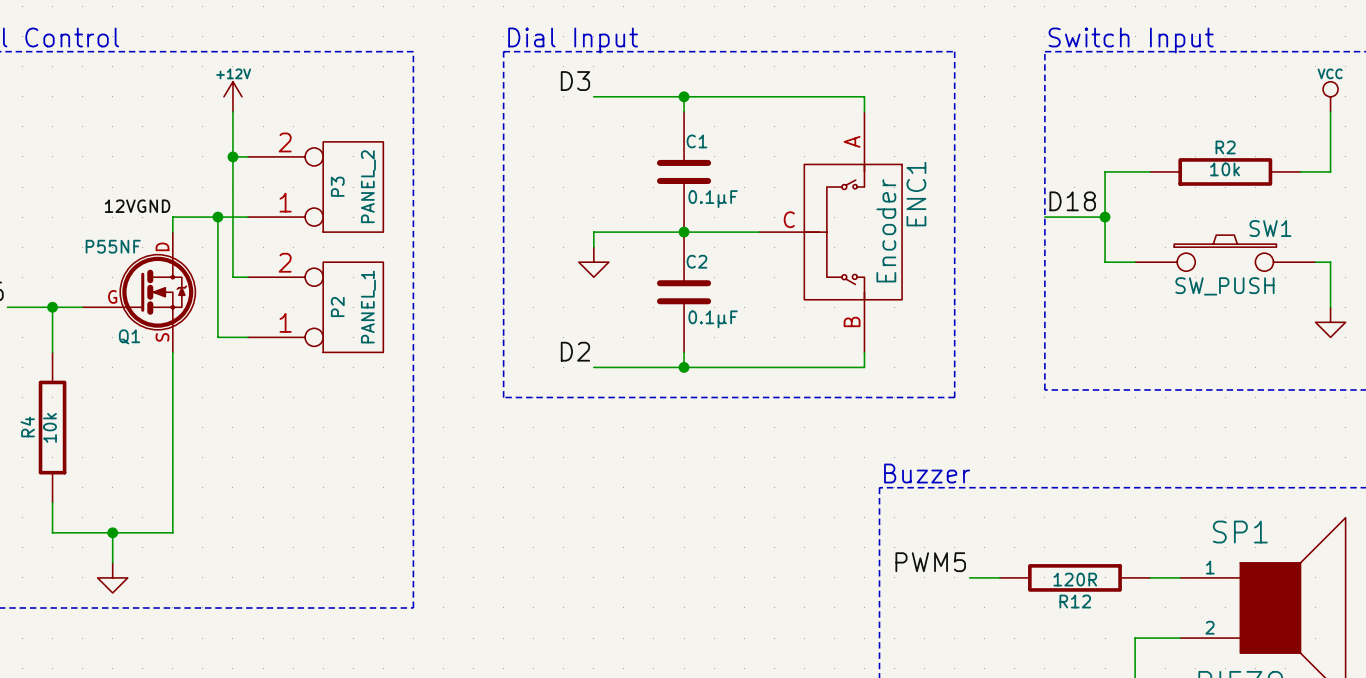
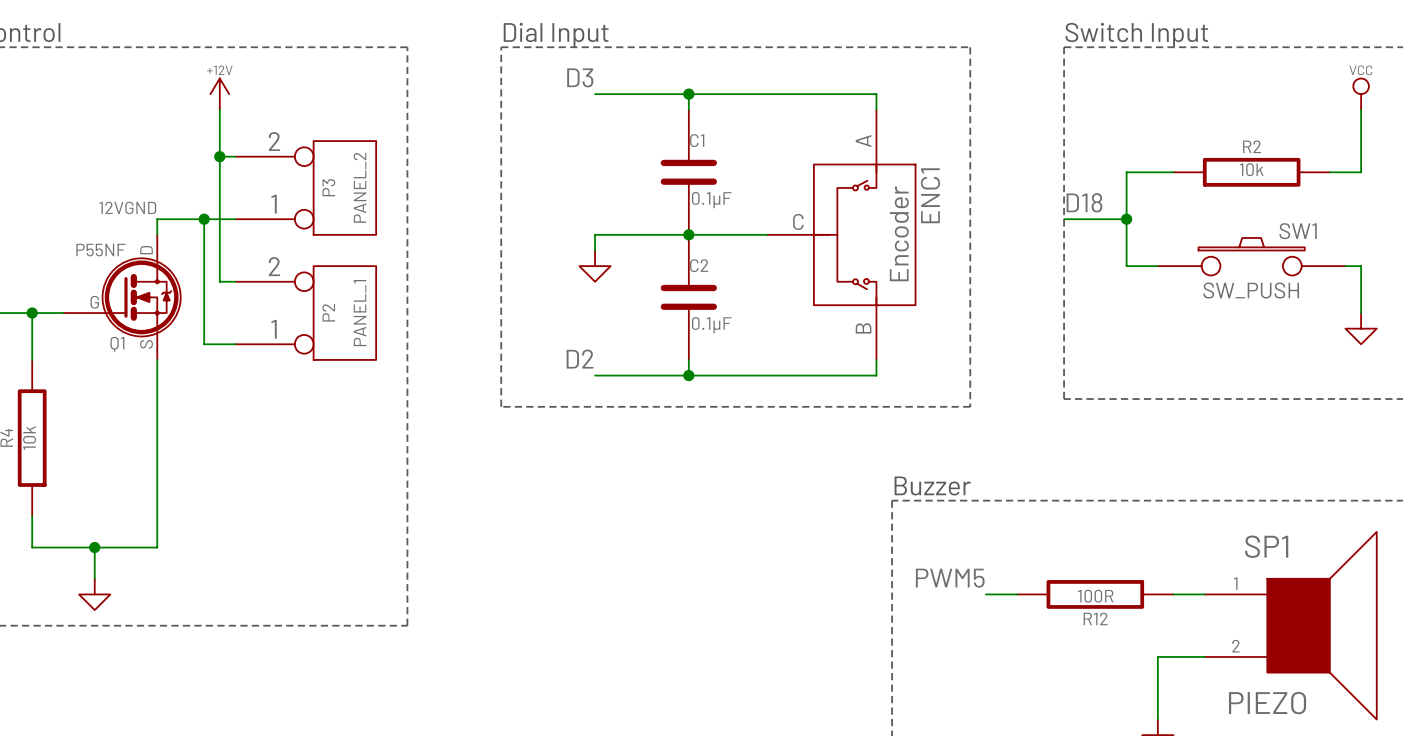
R12 value: 120R (1075, 579) -> 100R (1095, 596)

